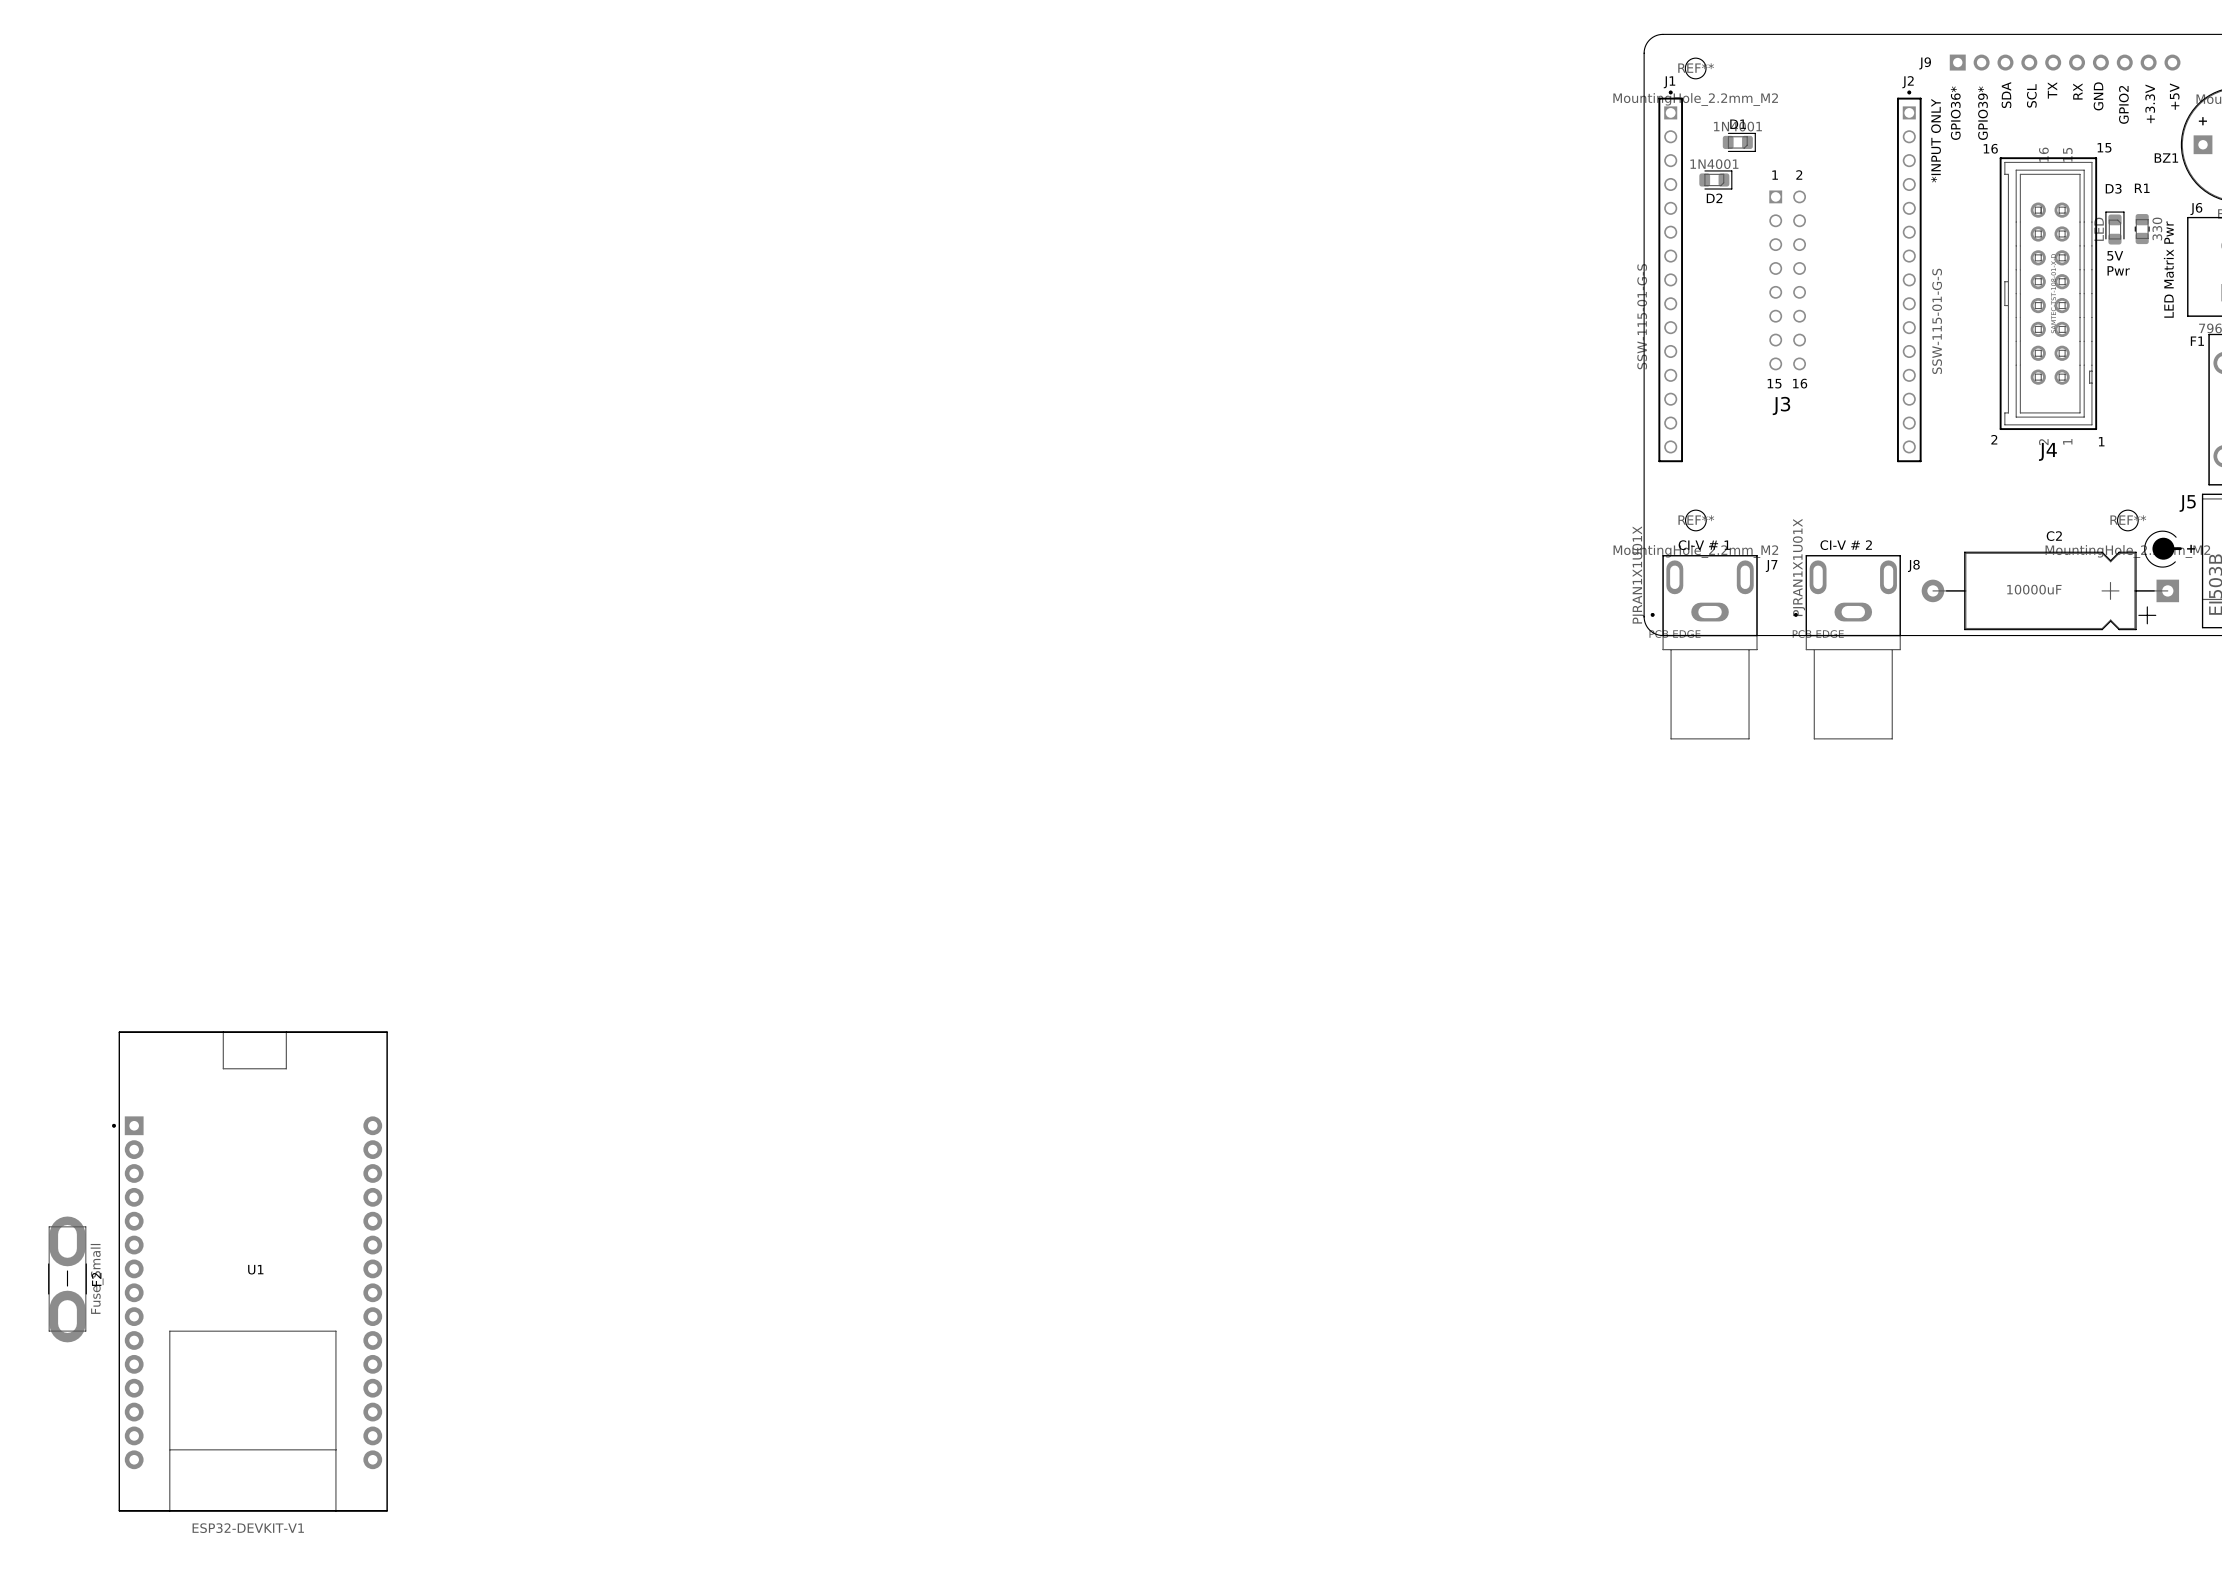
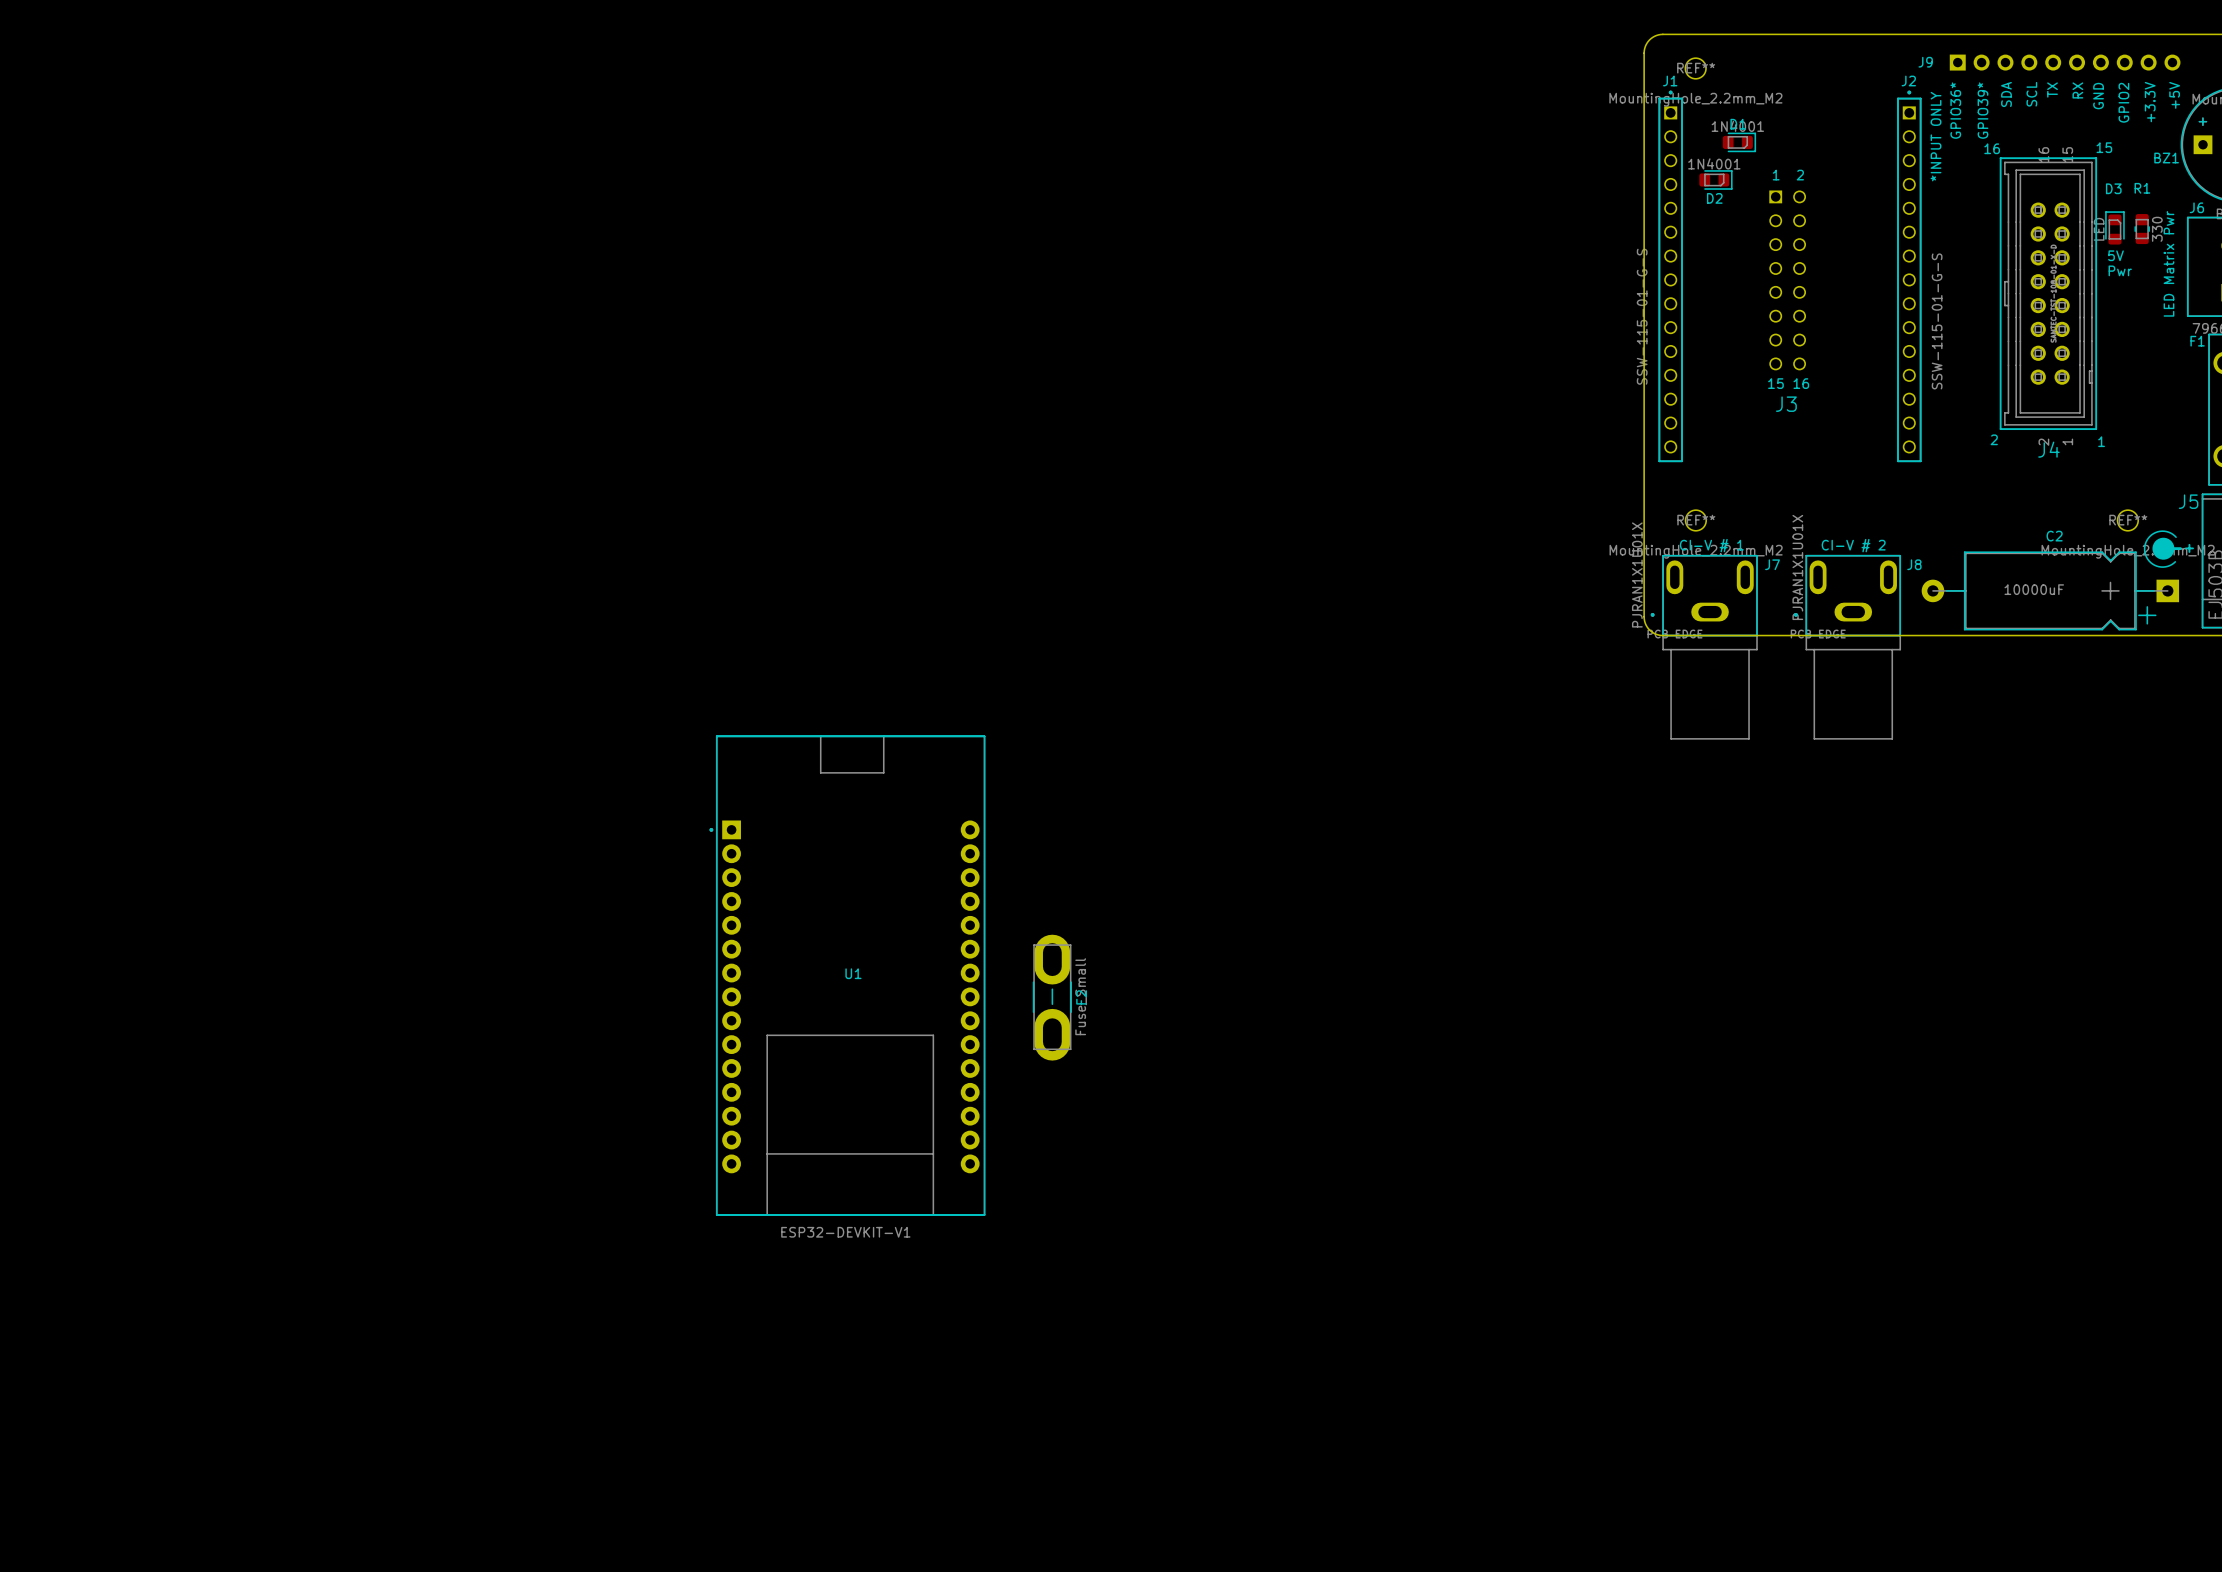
U1 position: (249, 1271) -> (847, 975)
F2 position: (67, 1279) -> (1052, 997)

